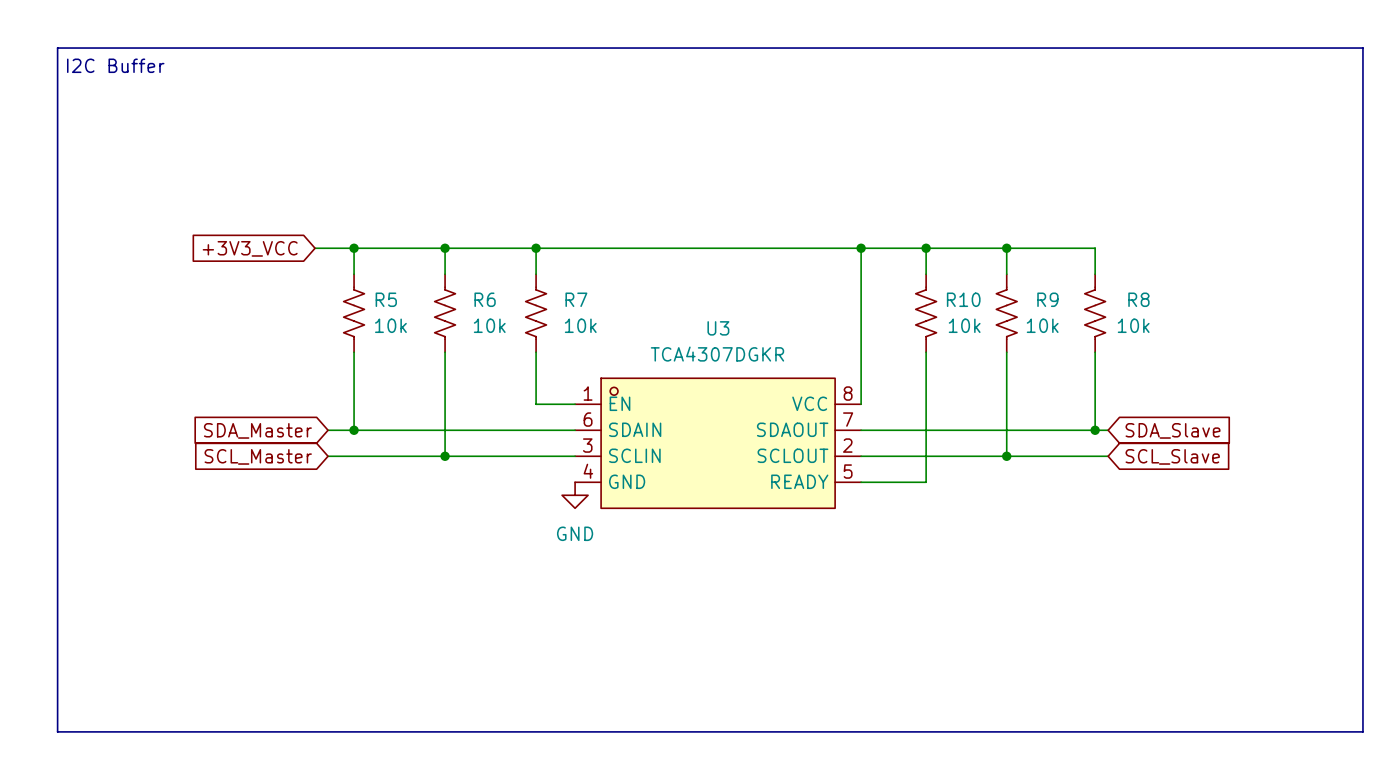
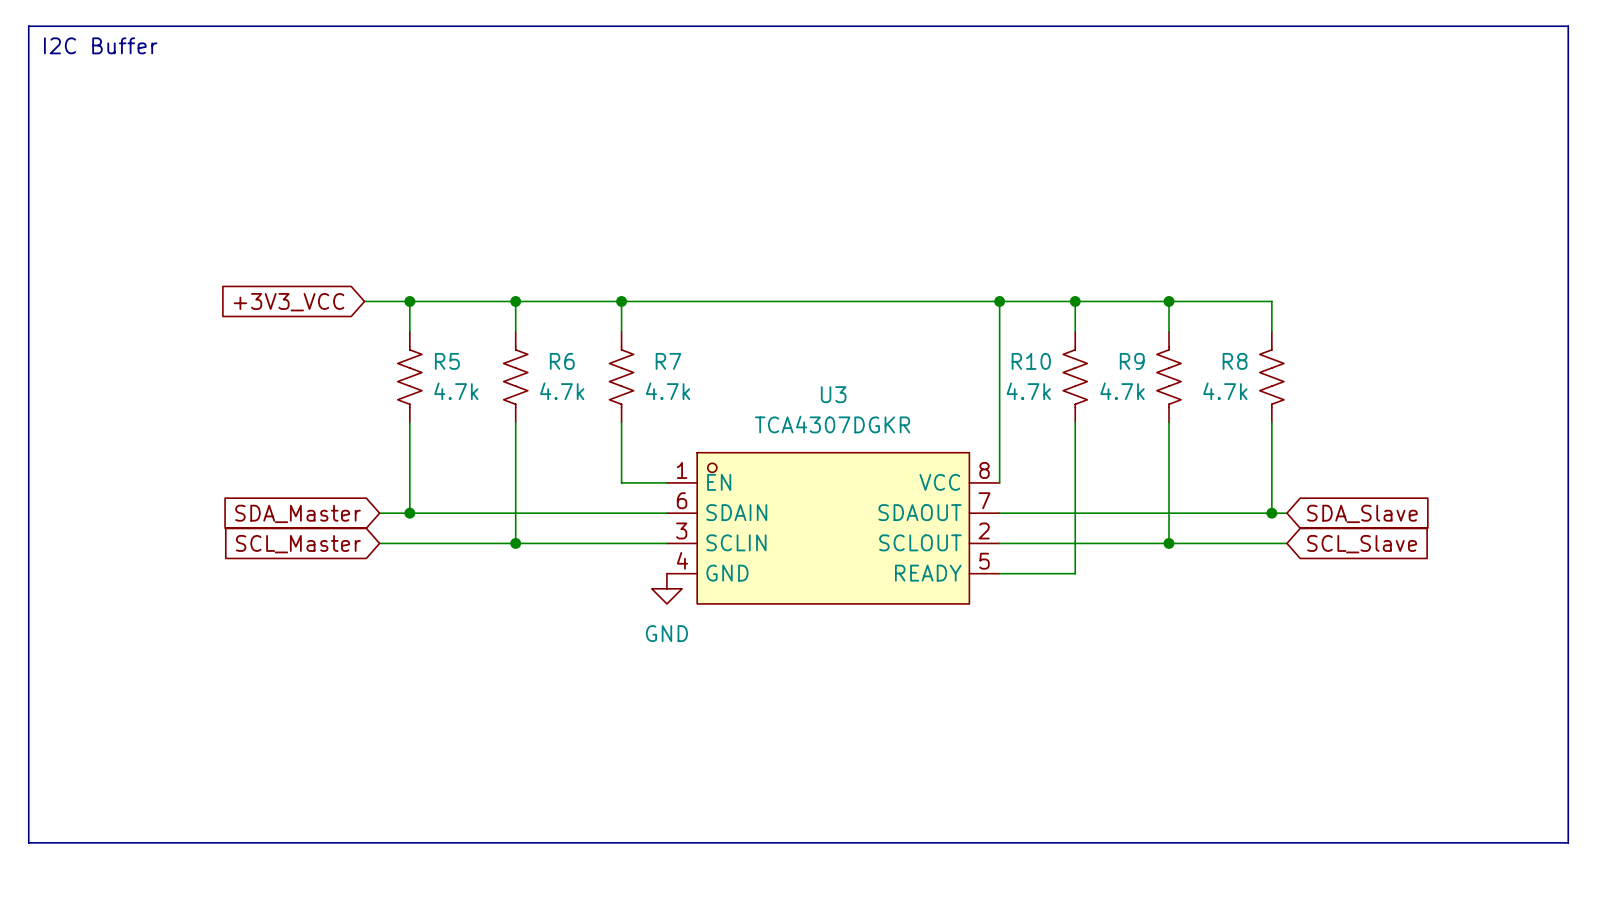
line: (57, 48) (1362, 48) (1362, 731) (57, 731) (57, 48) -> (28, 26) (28, 842) (1568, 842) (1568, 26) (28, 26)
text position: I2C Buffer (115, 65) -> I2C Buffer (100, 45)
R10 name position: R10 (963, 299) -> R10 (1031, 361)
R9 name position: R9 (1047, 299) -> R9 (1132, 361)
R8 name position: R8 (1138, 299) -> R8 (1235, 361)
R5 value: 10k (390, 325) -> 4.7k (456, 391)
R6 value: 10k (489, 325) -> 4.7k (562, 391)
R7 value: 10k (580, 325) -> 4.7k (668, 391)
R10 value: 10k (964, 325) -> 4.7k (1028, 391)
R9 value: 10k (1042, 325) -> 4.7k (1122, 391)
R8 value: 10k (1133, 325) -> 4.7k (1225, 391)

